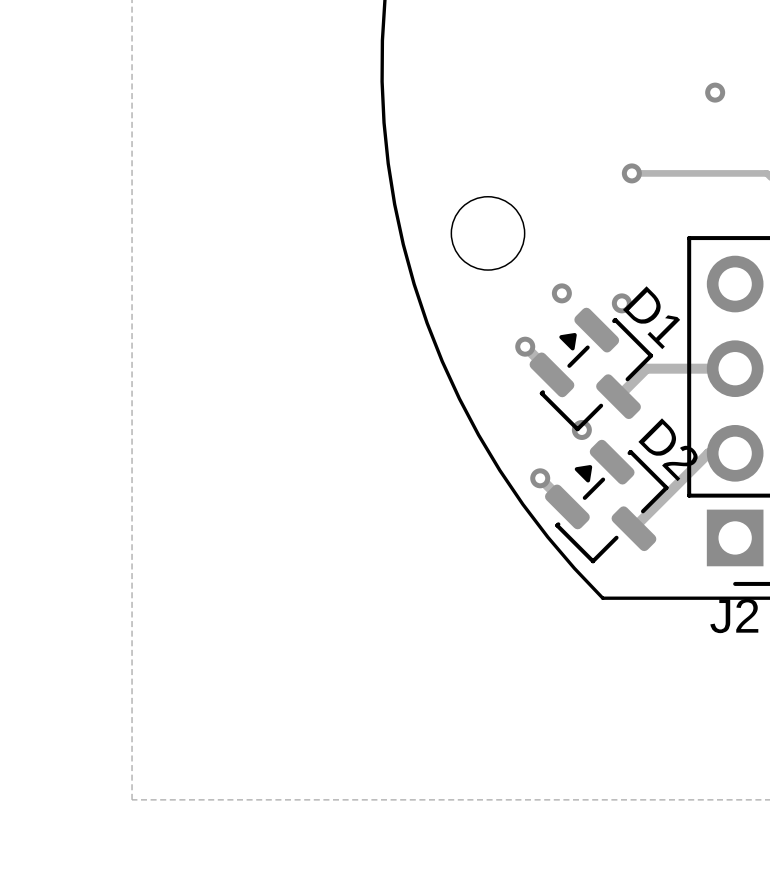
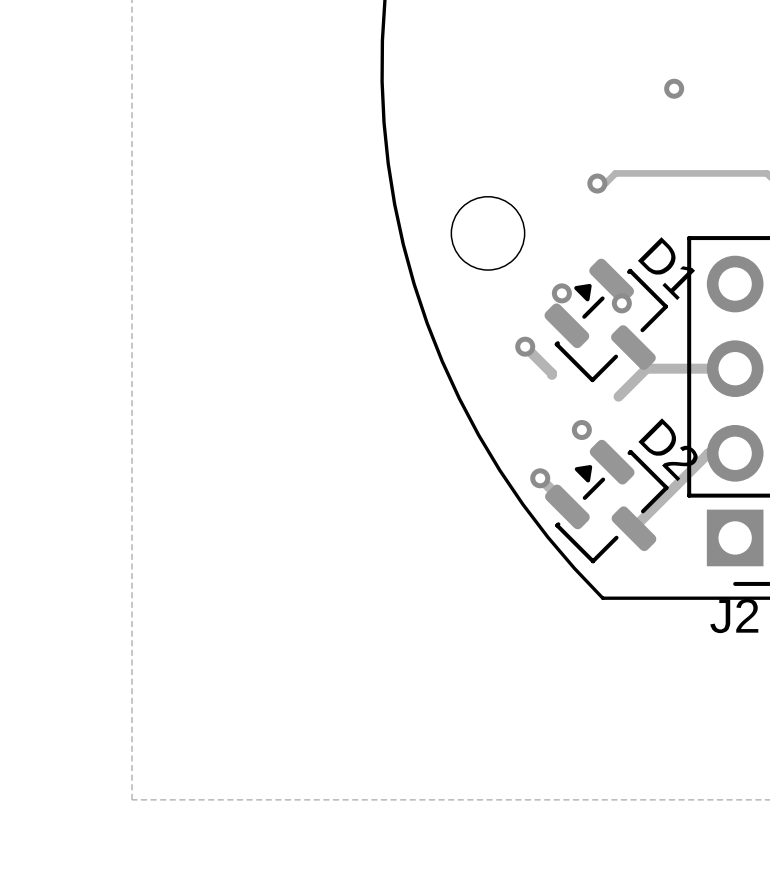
via position: (715, 92) -> (674, 88)
track: none -> (631, 173) (615, 173) (605, 183) (597, 183)
via position: (631, 173) -> (597, 183)
D1 position: (591, 369) -> (606, 320)

